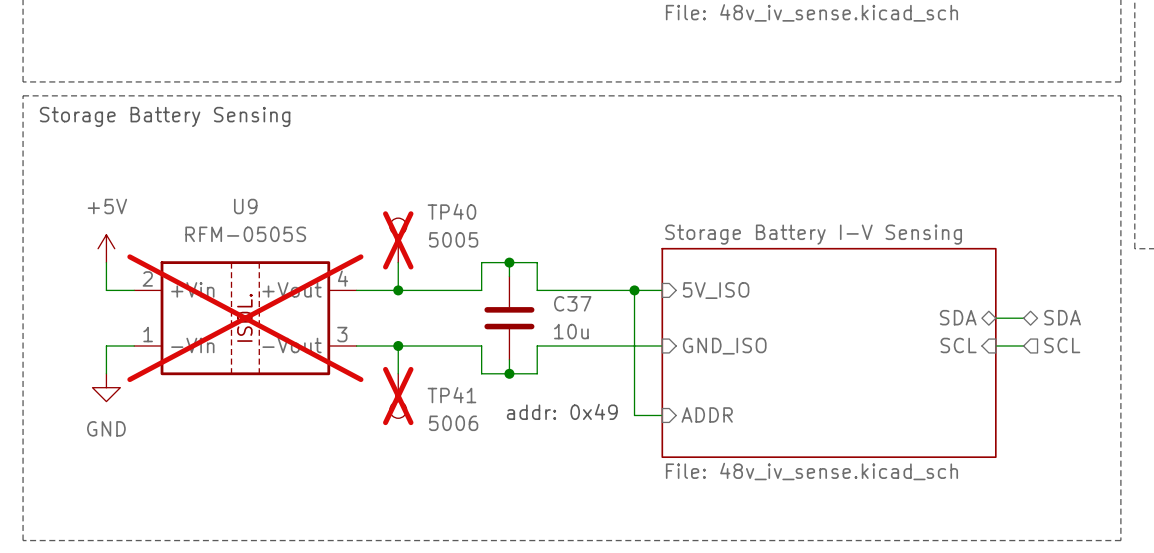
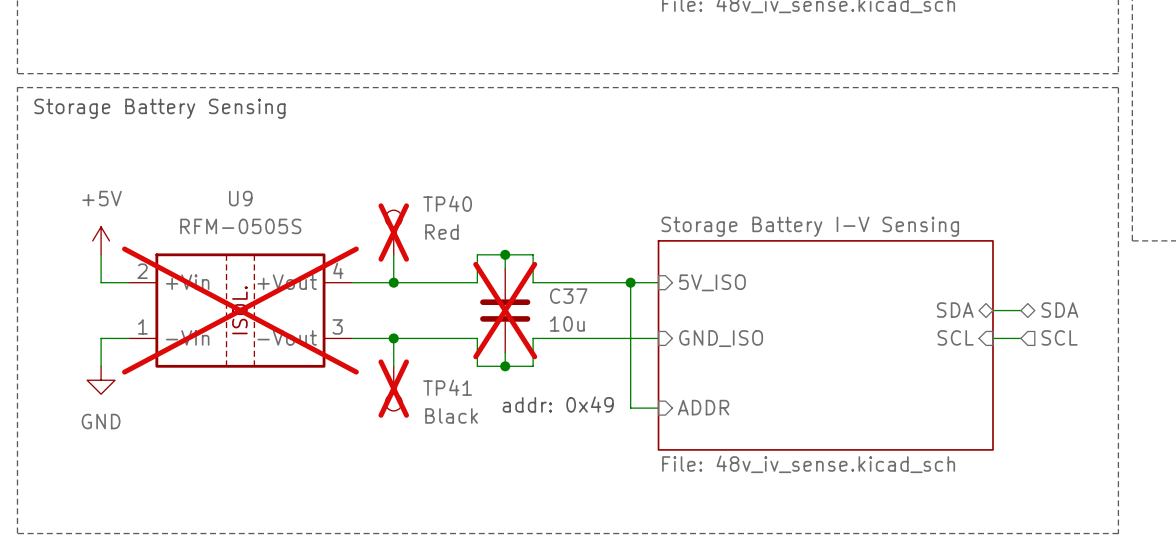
TP40 value: 5005 (453, 239) -> Red (441, 232)
C37 do-not-place cross: none -> (505, 310)
TP41 value: 5006 (453, 423) -> Black (451, 415)

